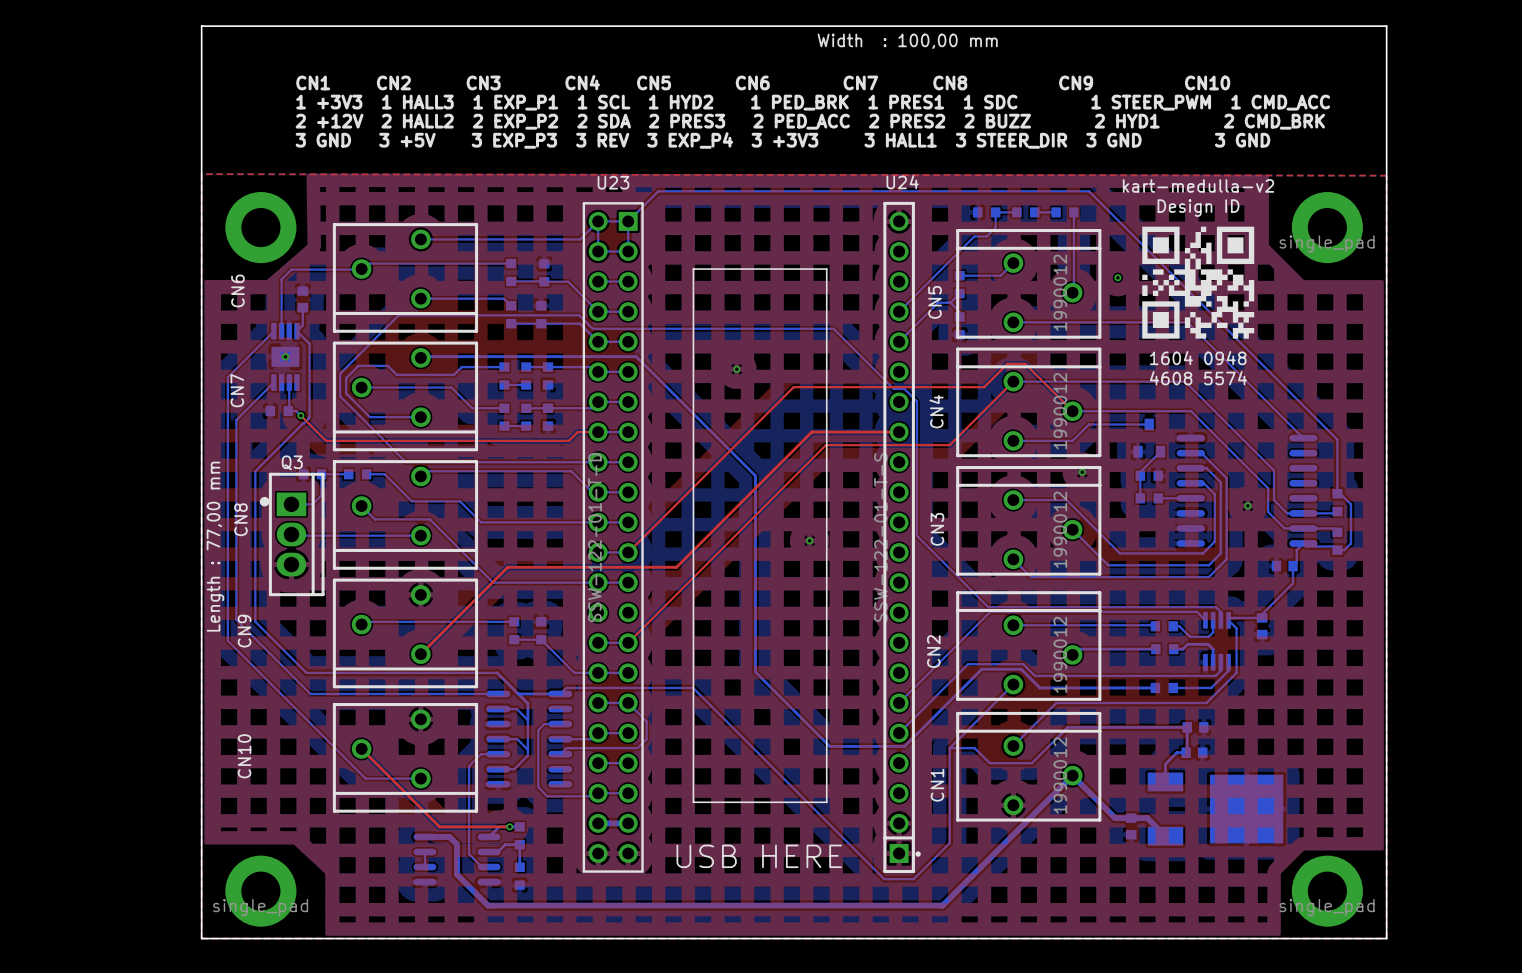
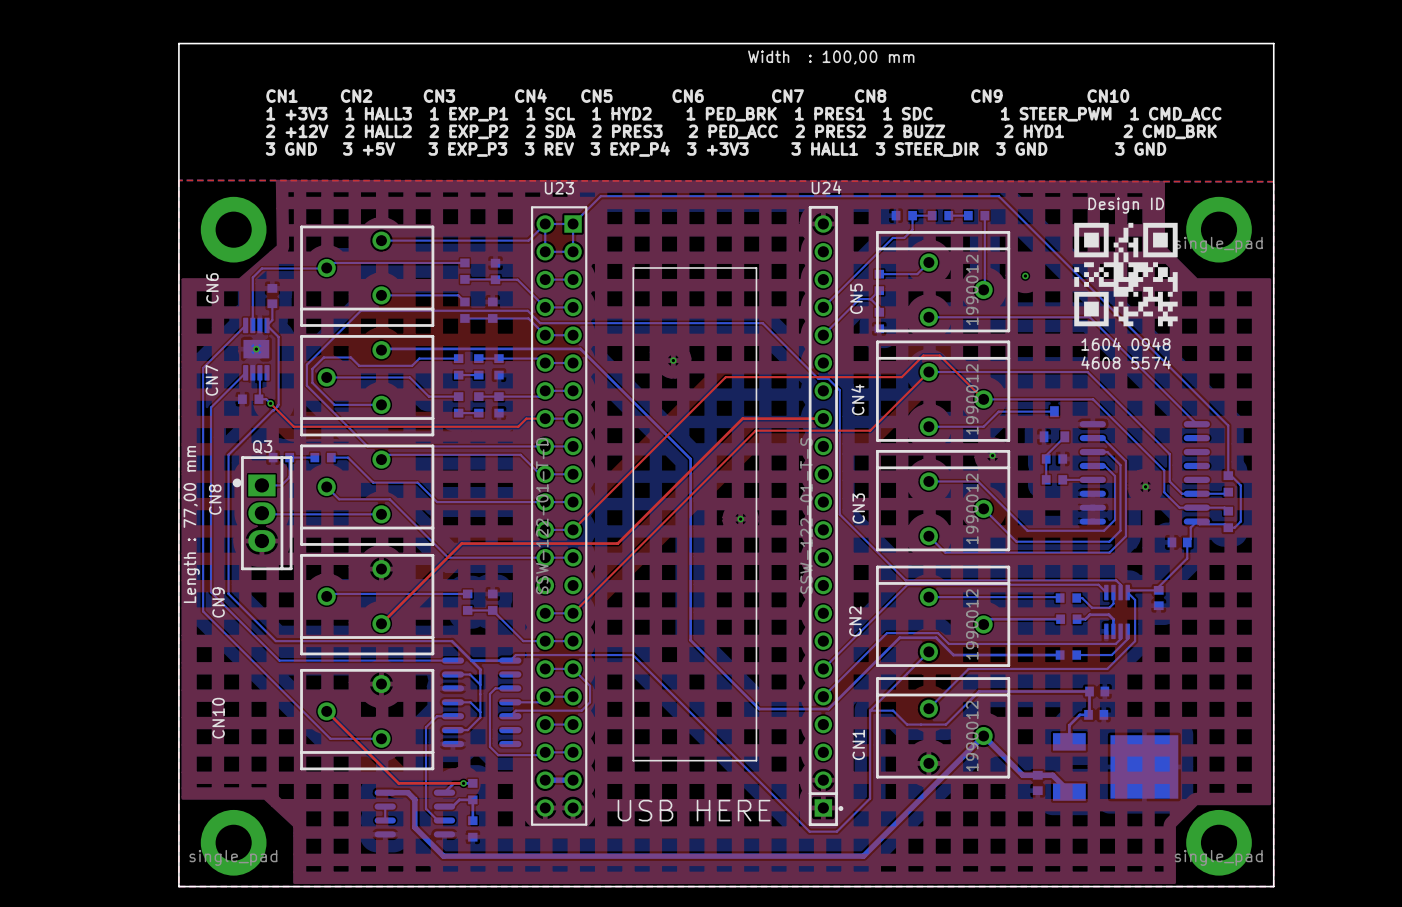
drawing: none -> [1074, 222, 1178, 327]
drawing: [1142, 226, 1255, 339] -> none

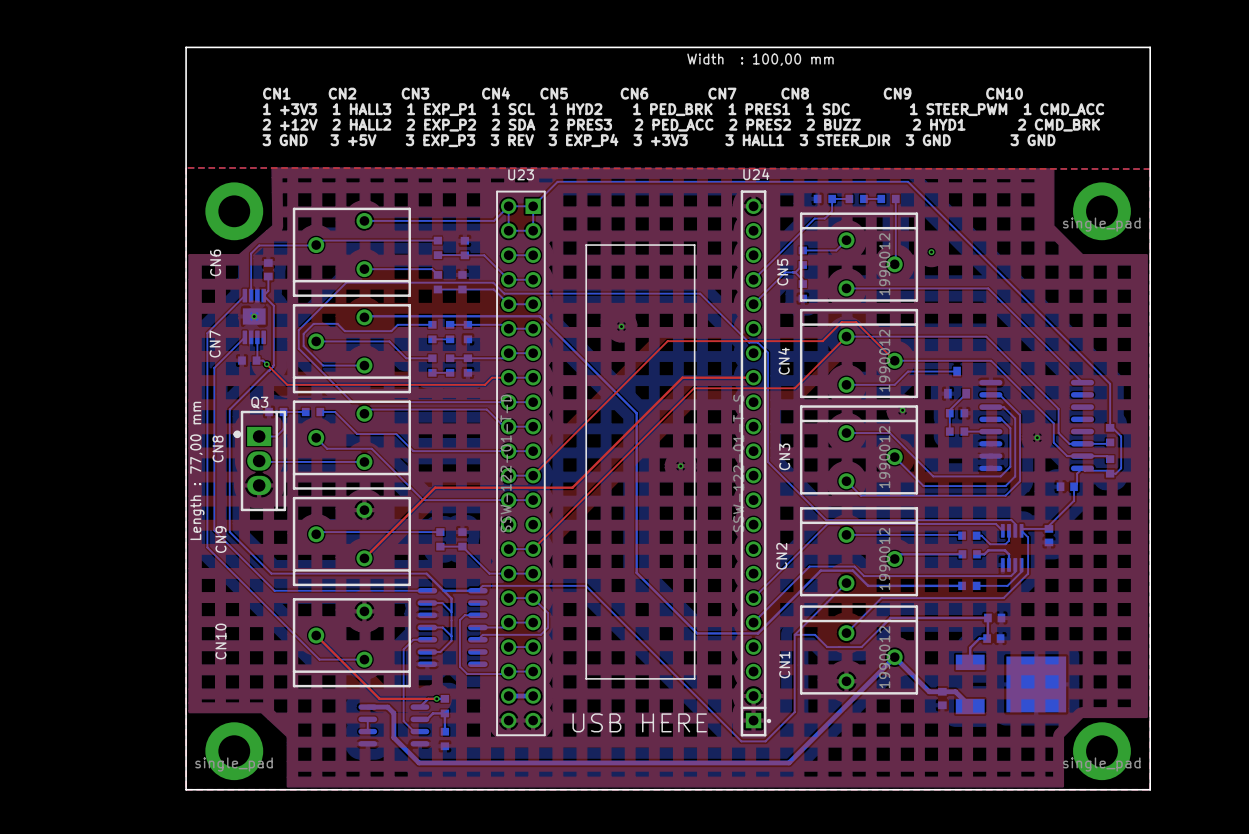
drawing: [1074, 222, 1178, 327] -> none

